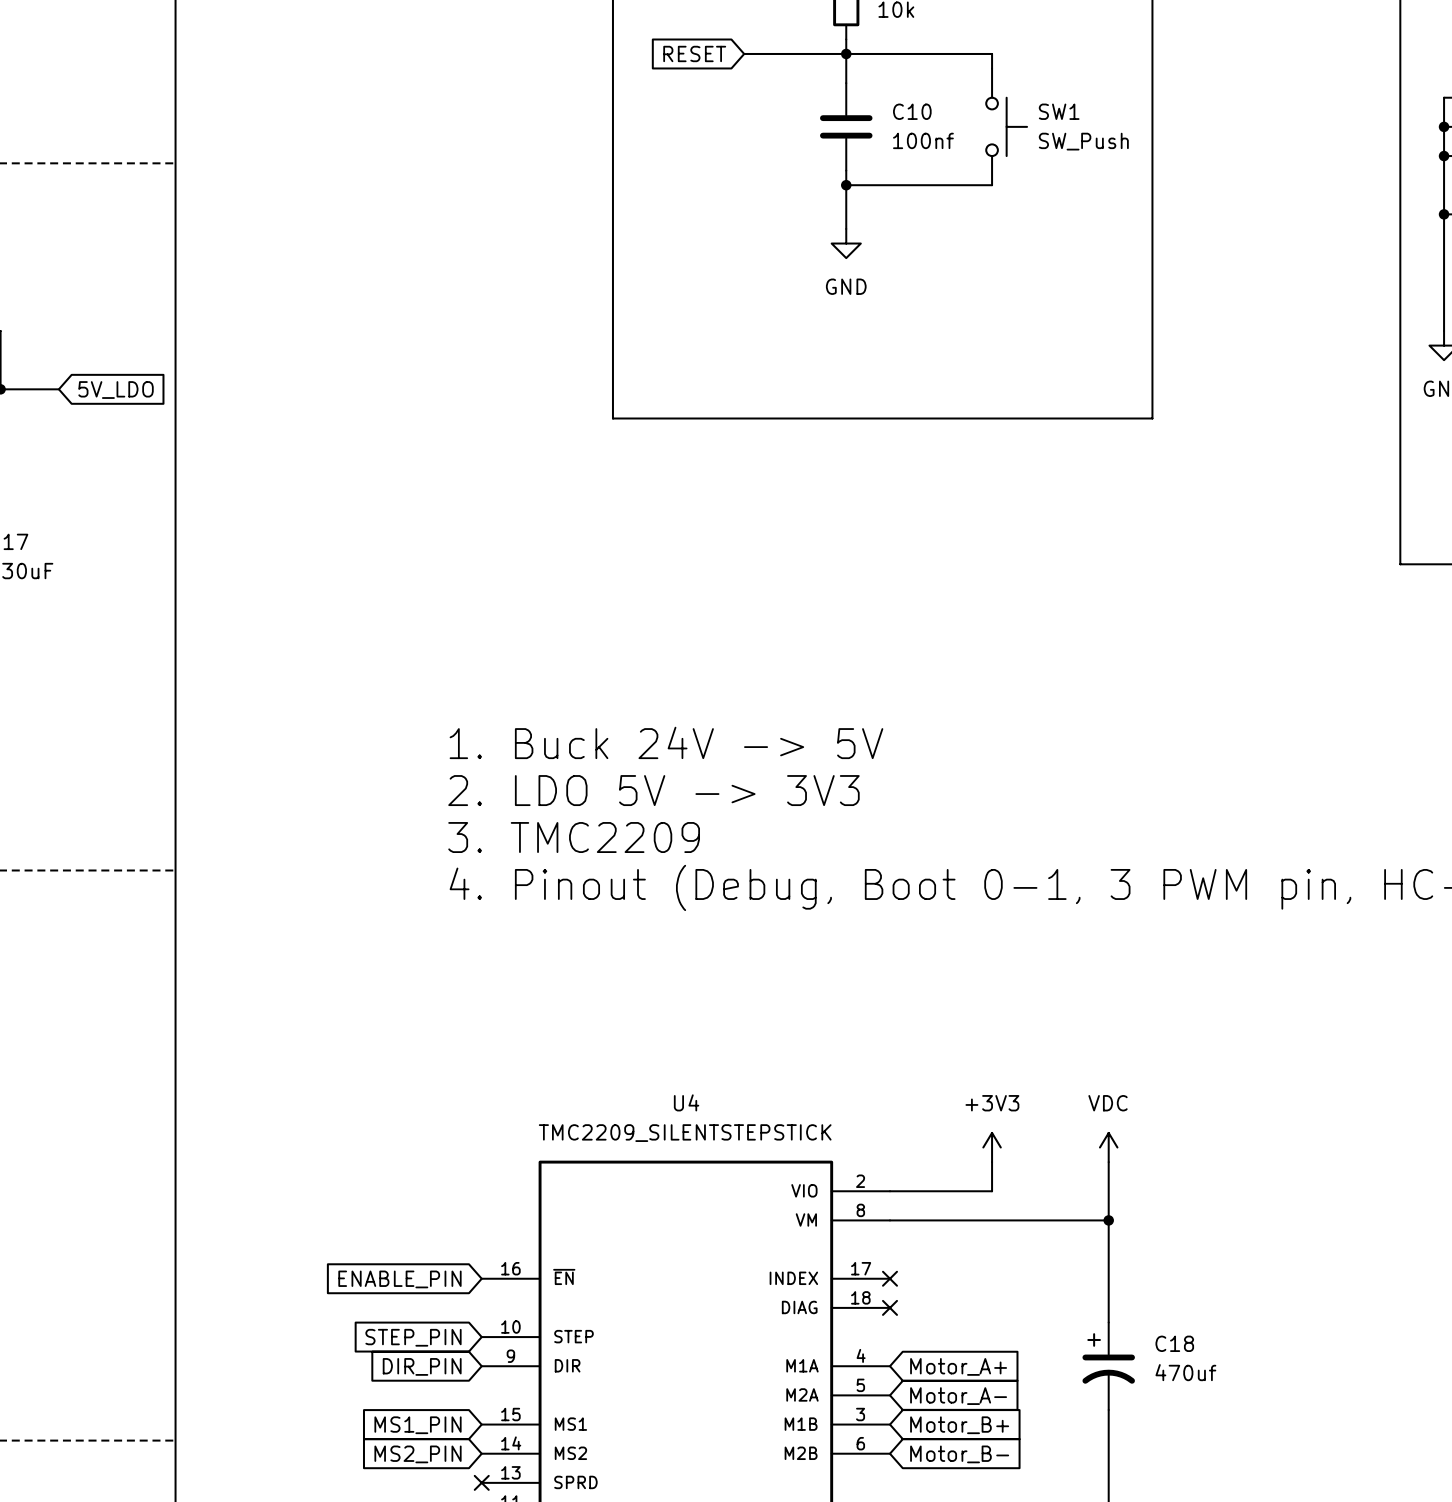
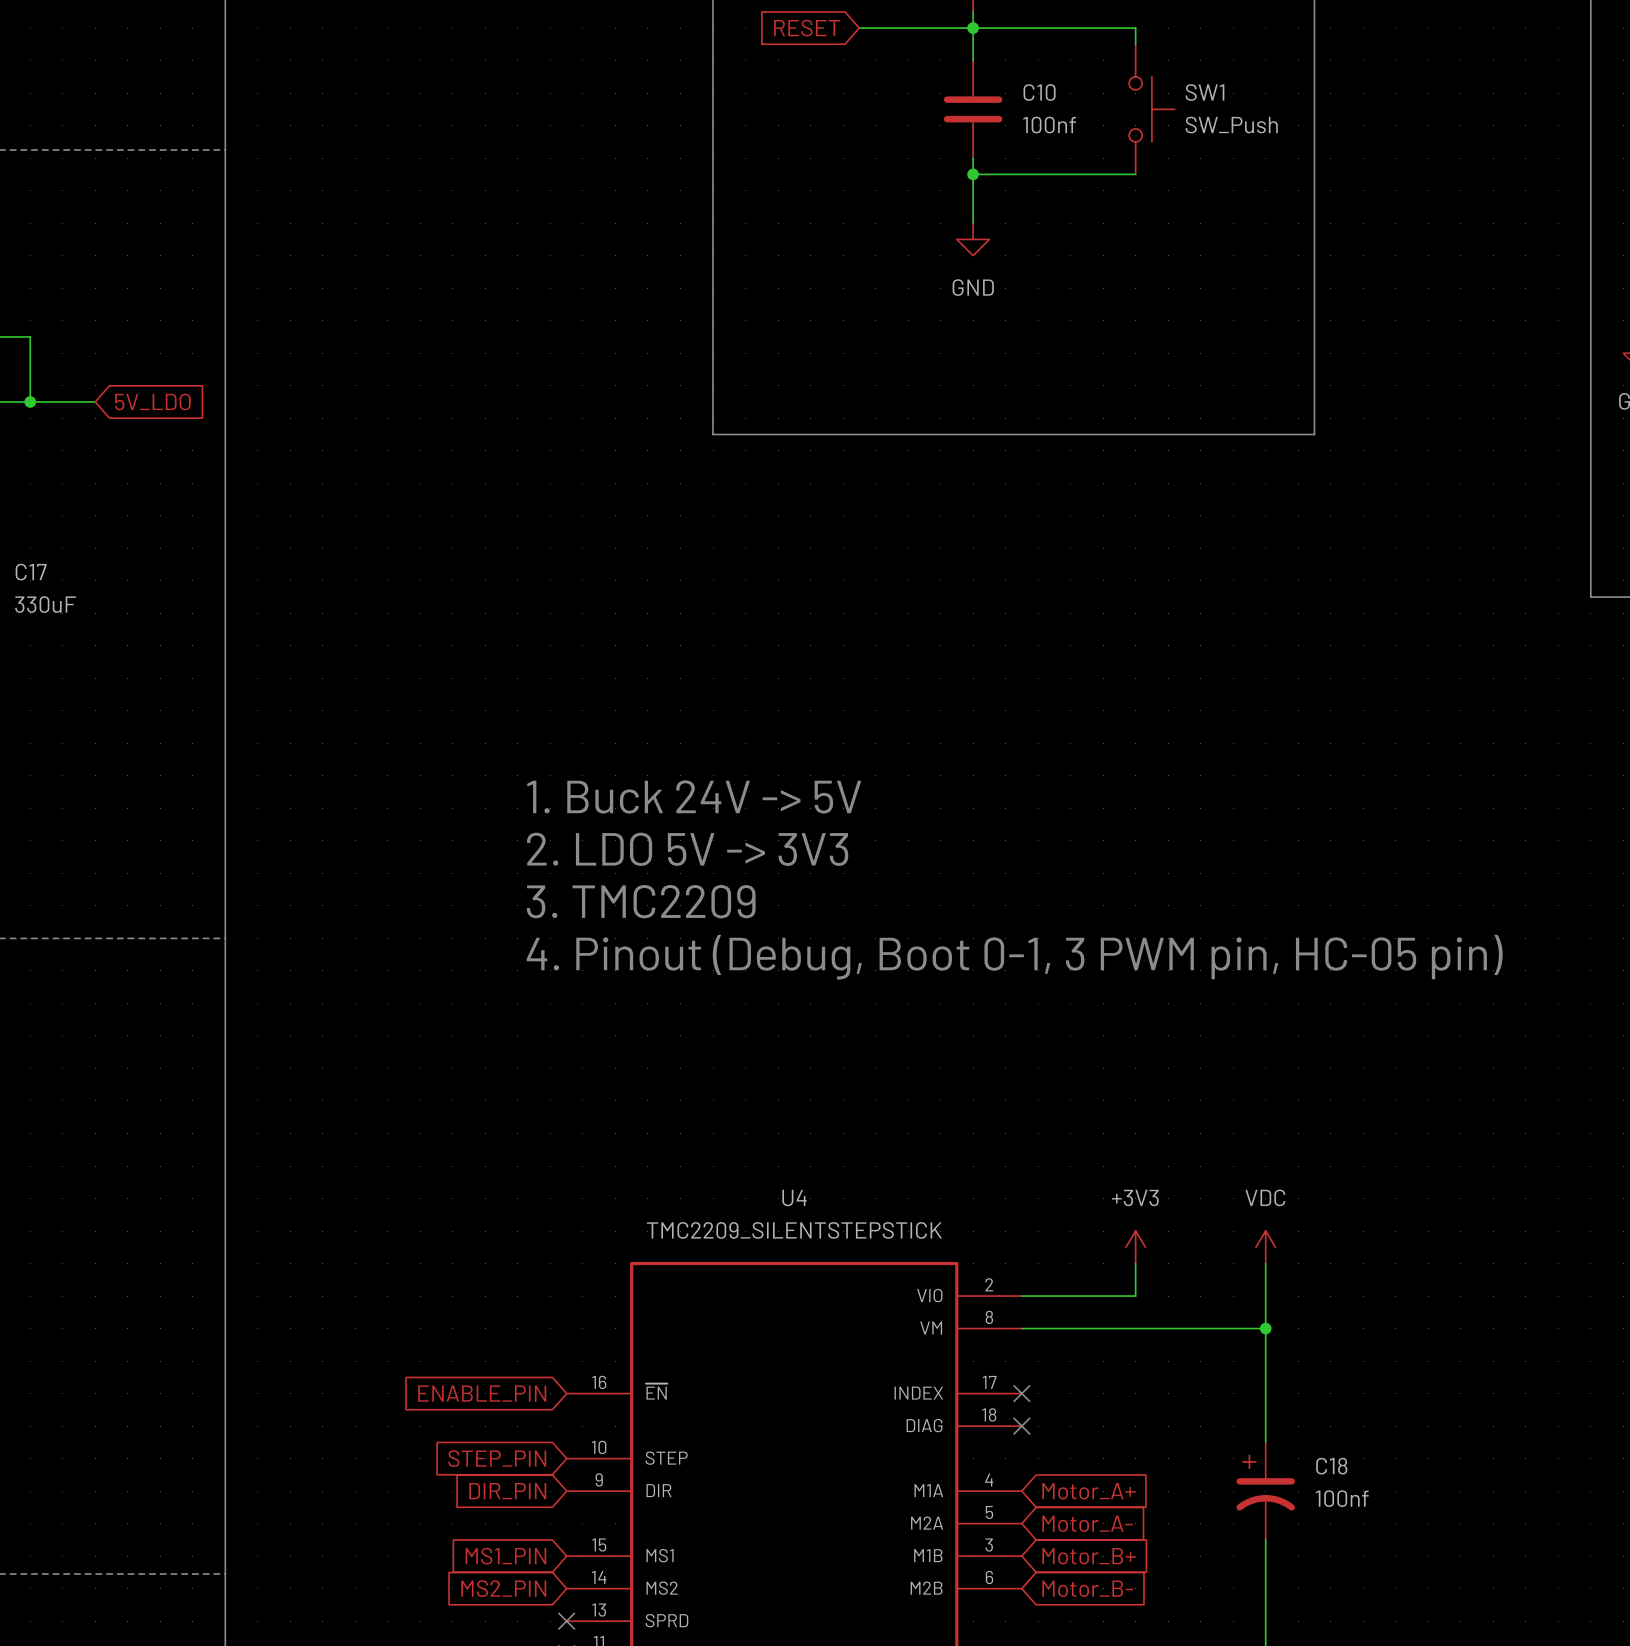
C18 value: 470uf (1185, 1372) -> 100nf (1342, 1498)

